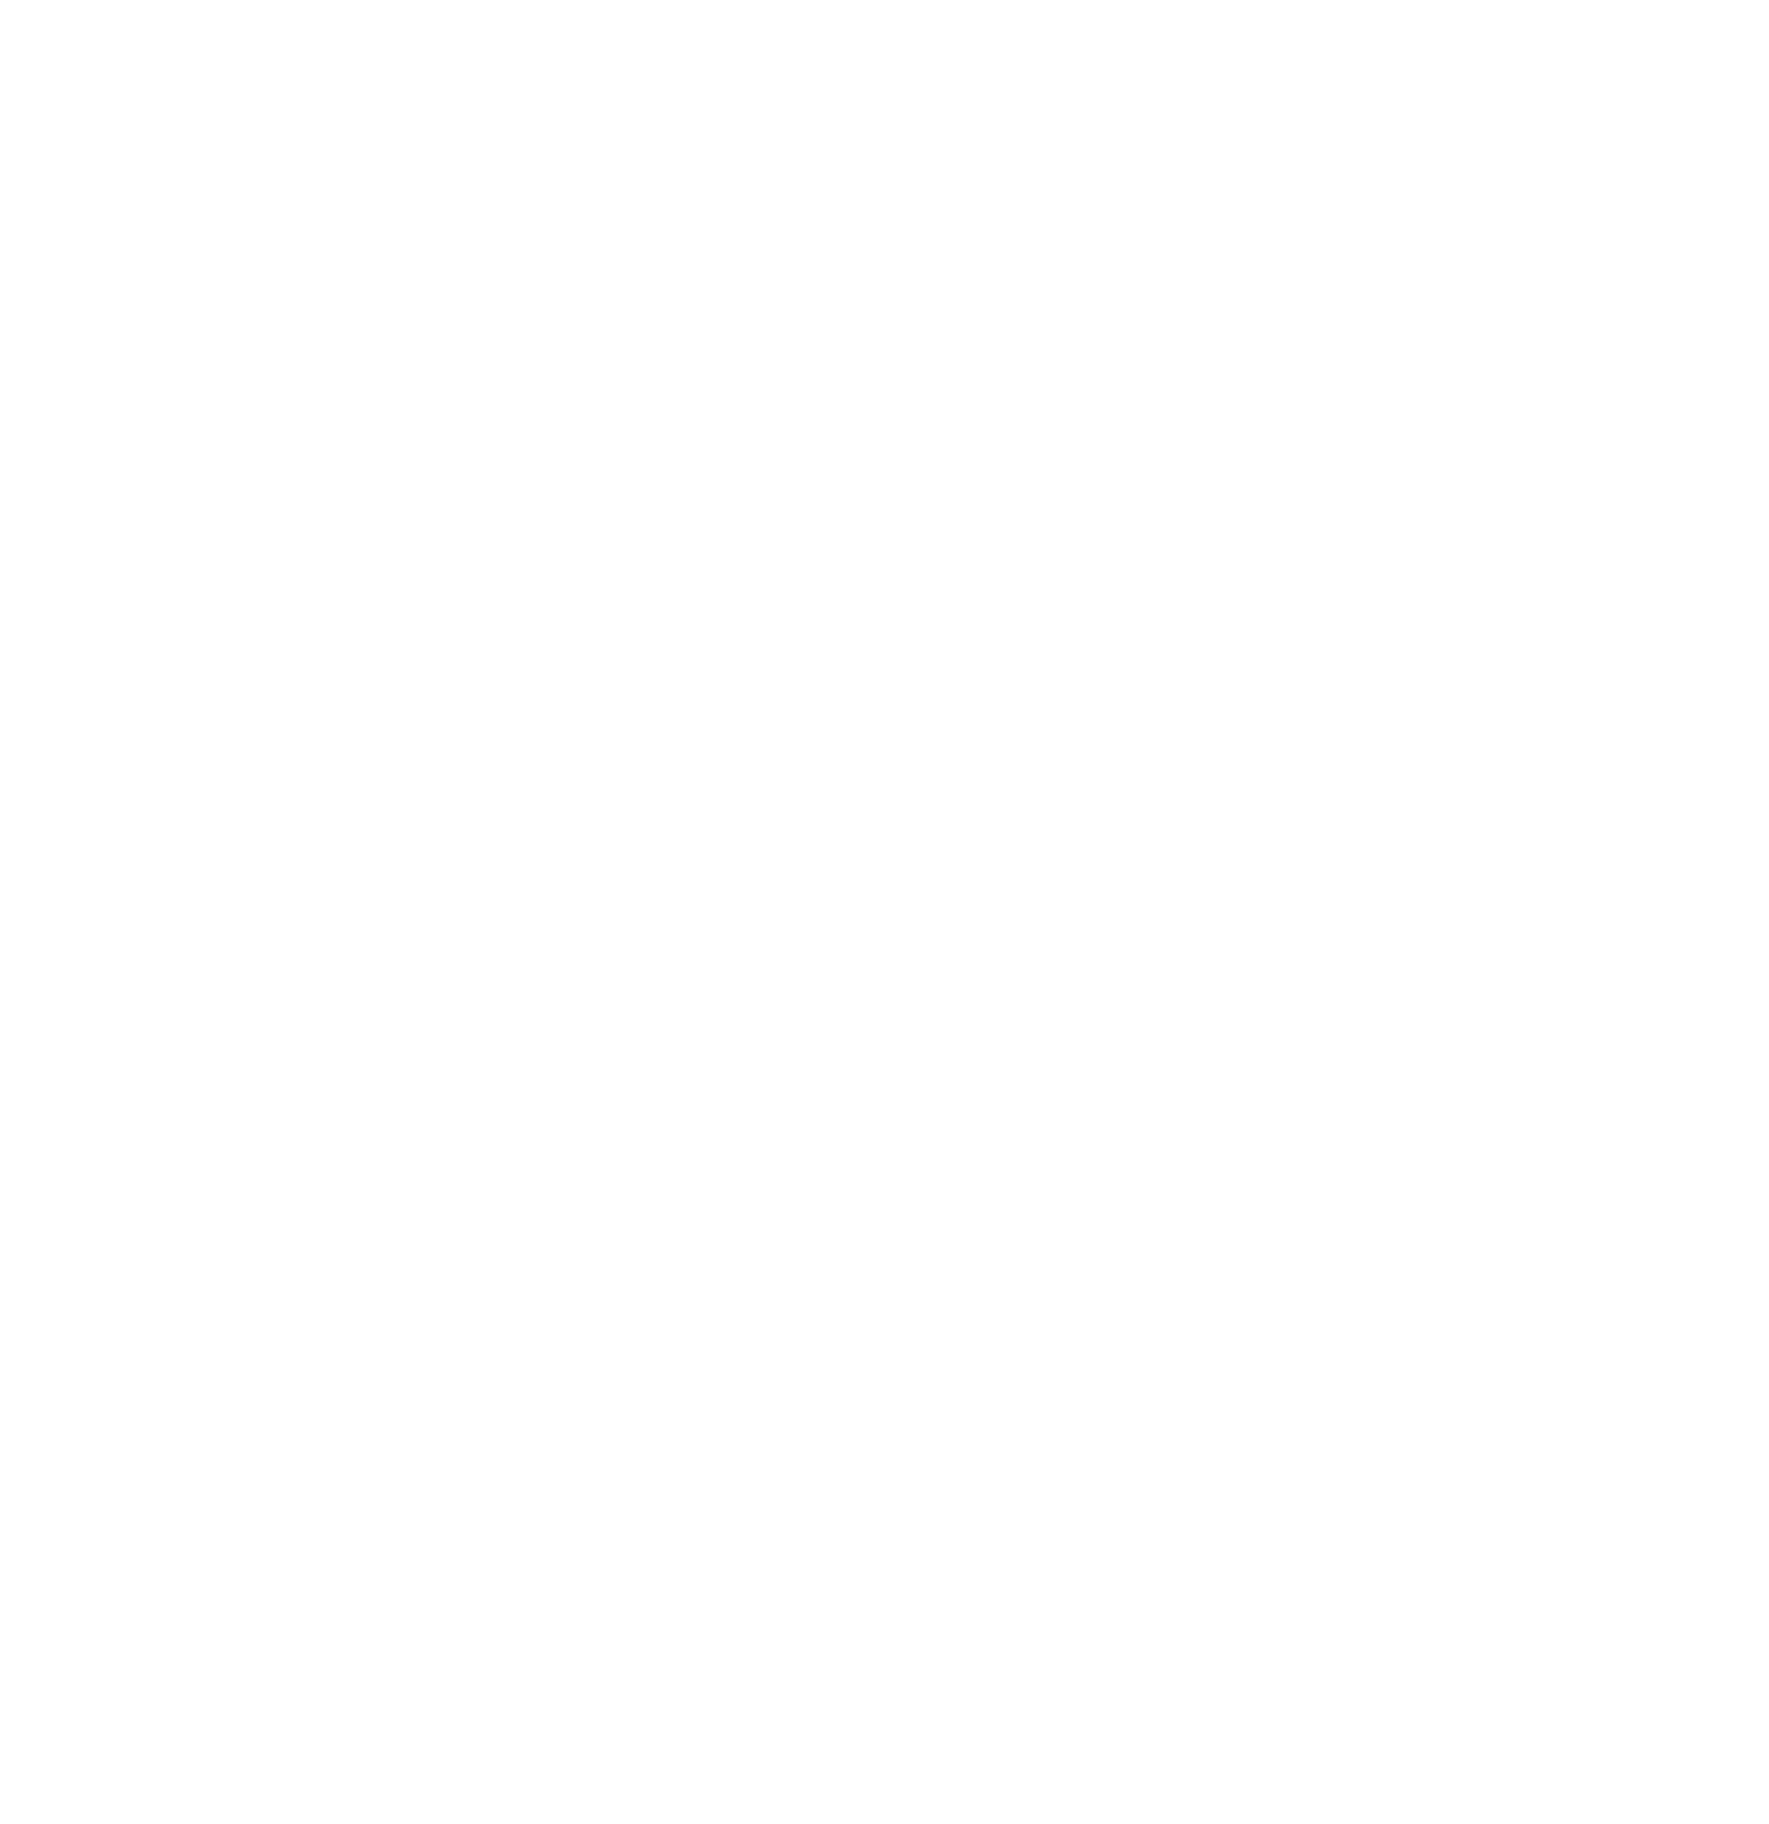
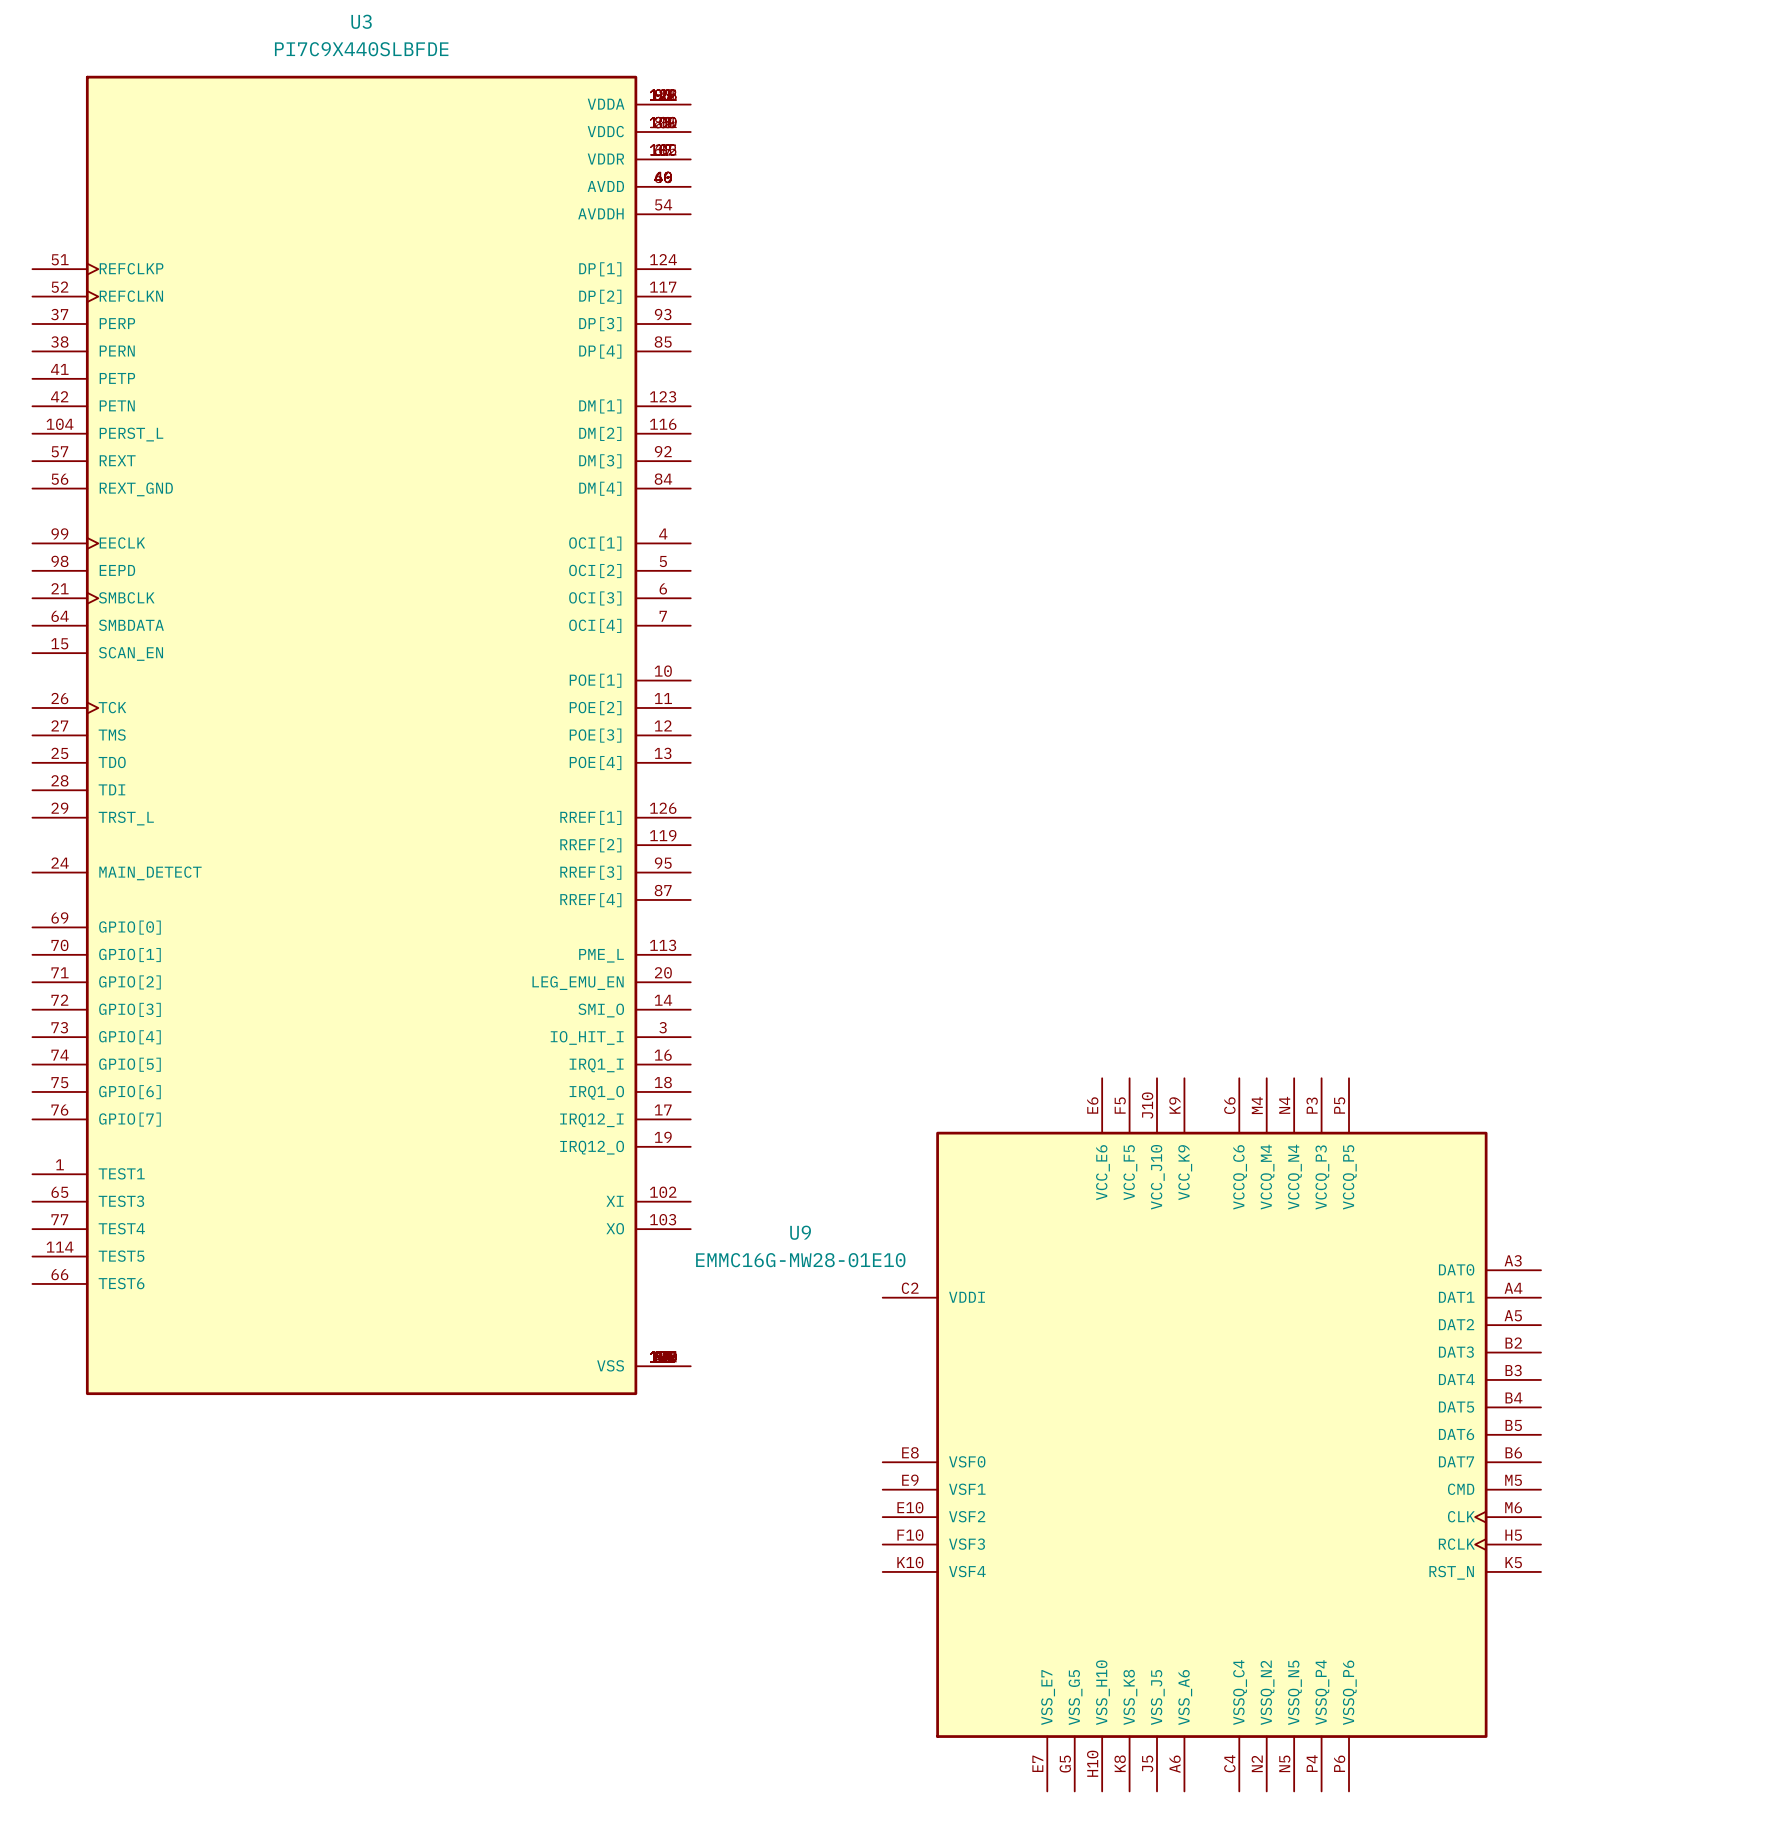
U3: none -> PI7C9X440SLBFDE (361, 735)
U9: none -> EMMC16G-MW28-01E10 (1211, 1434)

